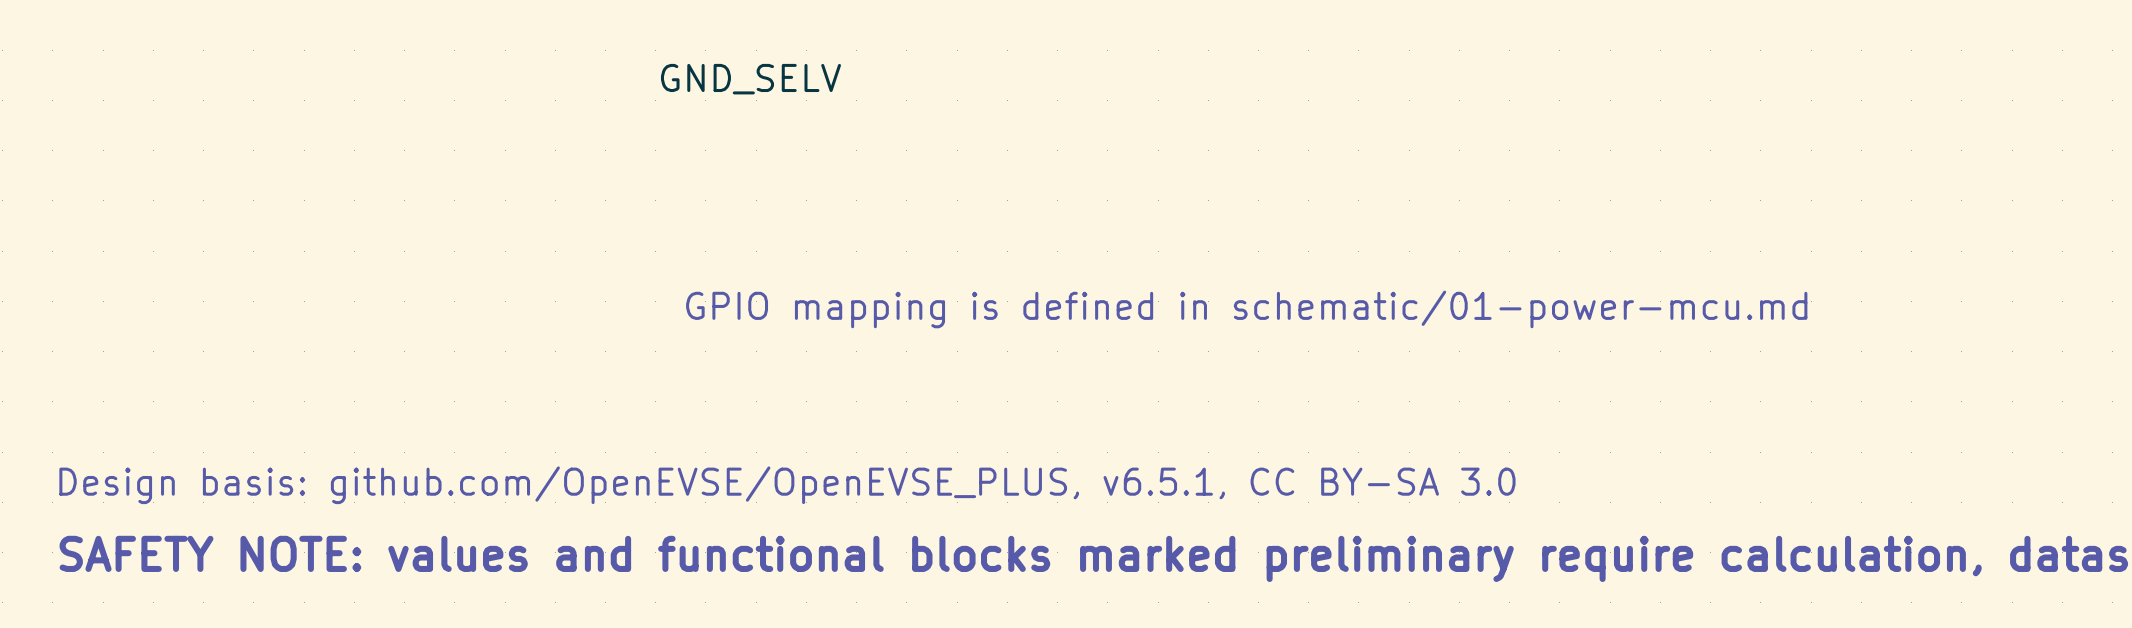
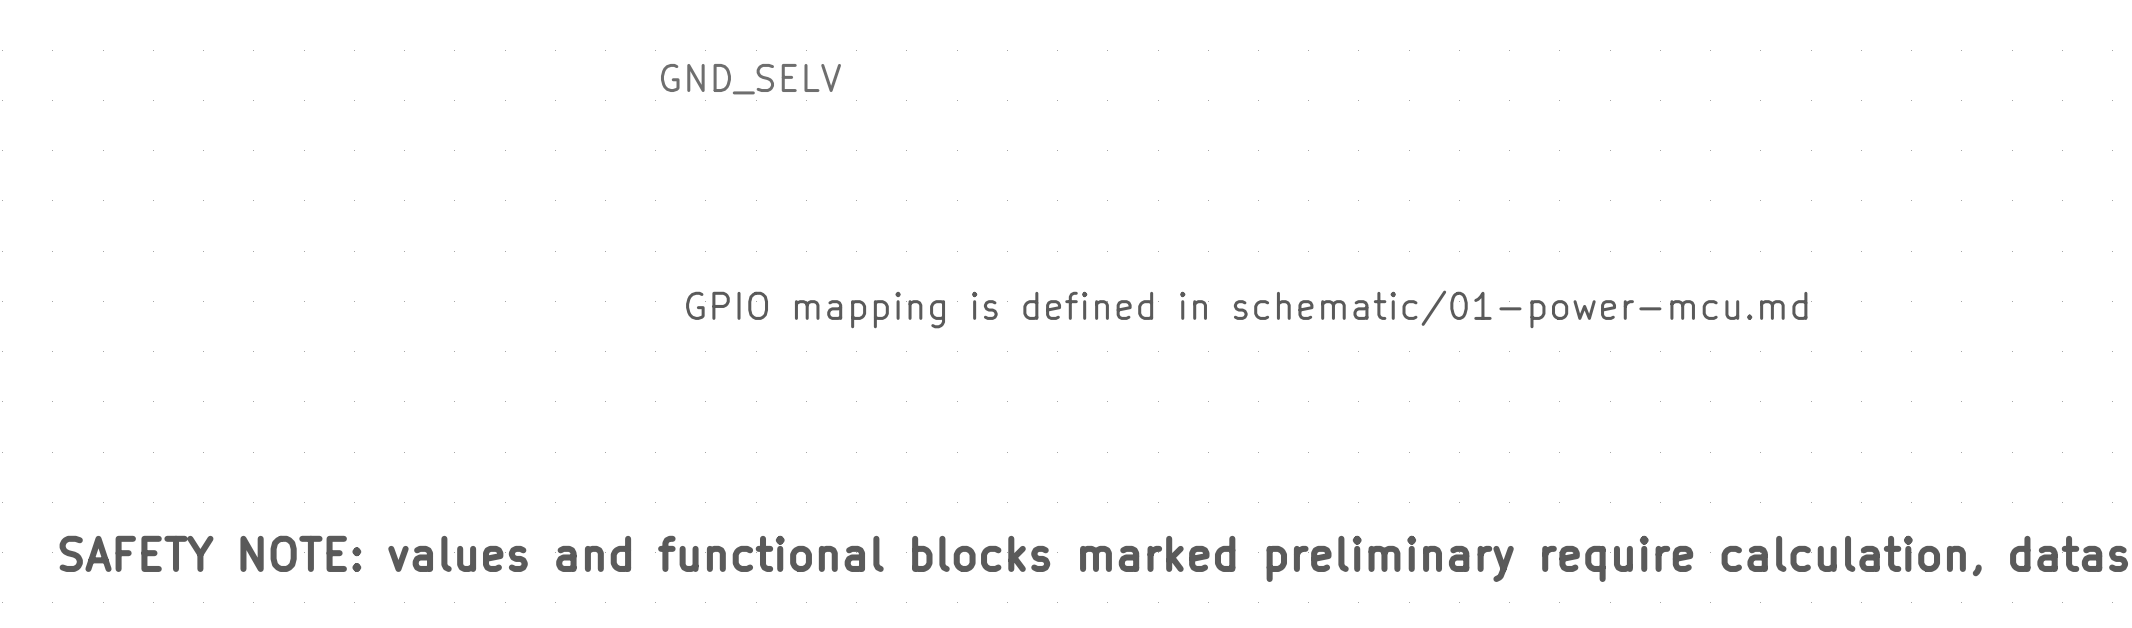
text: Design basis: github.com/OpenEVSE/OpenEVSE_PLUS, v6.5.1, CC BY-SA 3.0 (787, 485) -> none

